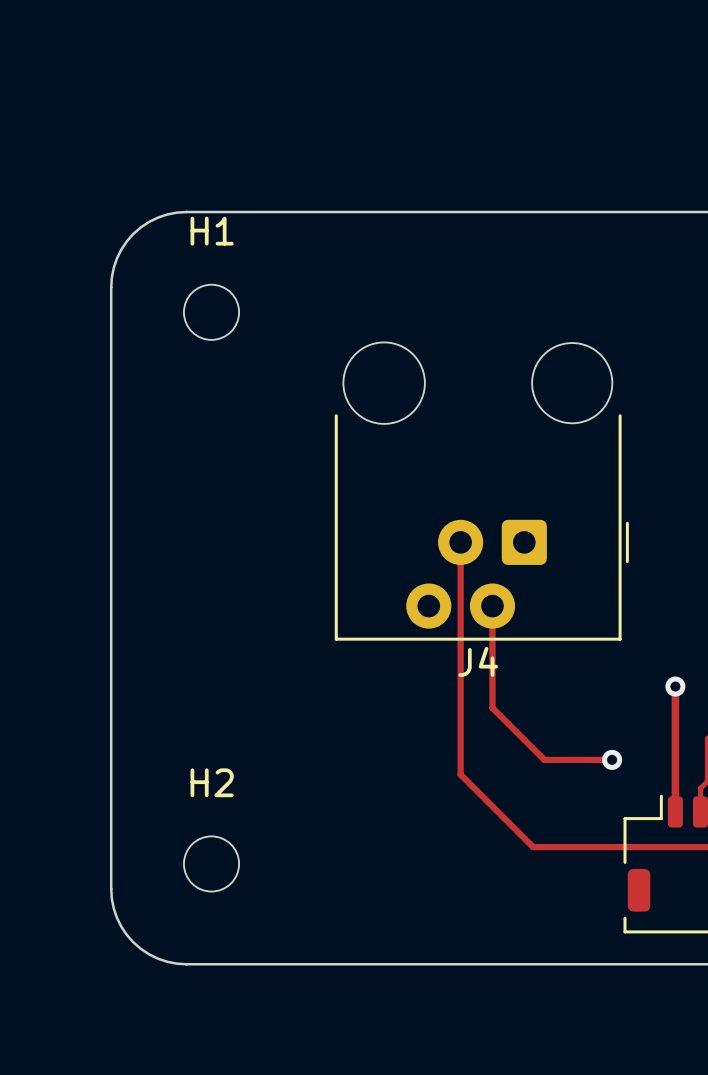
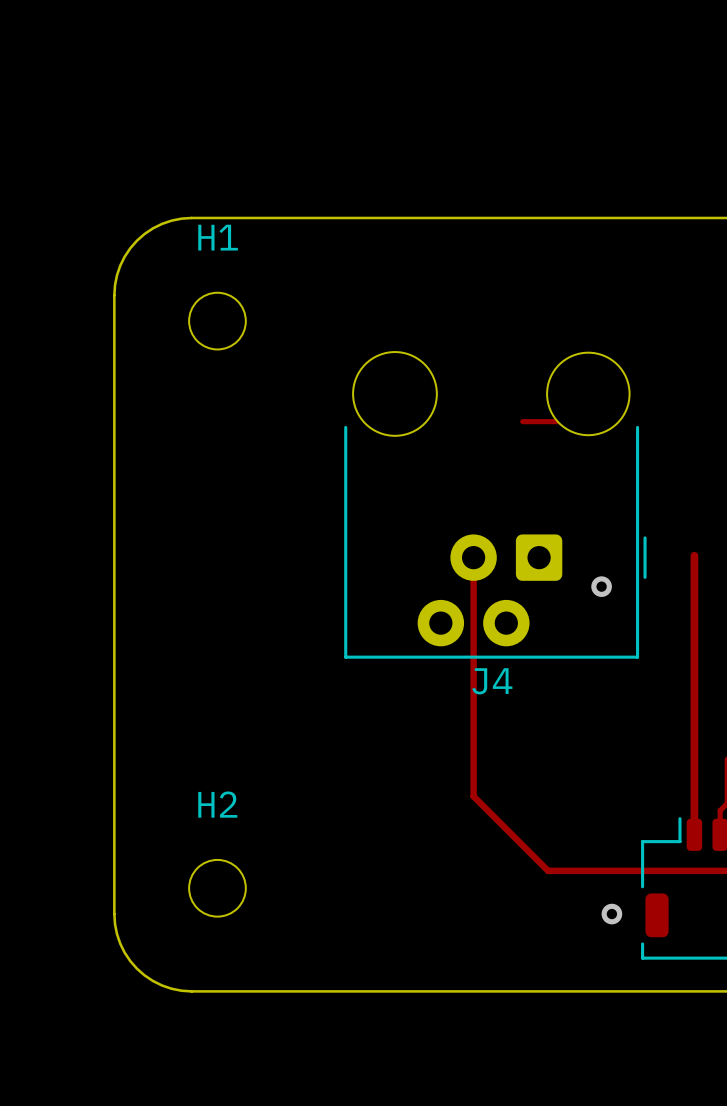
track: none -> (522, 421) (580, 421) (586, 426)
track: none -> (694, 555) (694, 705)
via: none -> (601, 586)
track: (492, 606) (492, 708) (544, 759) (612, 759) -> none
via: (675, 686) -> none
via: (612, 759) -> none
via: none -> (611, 914)

